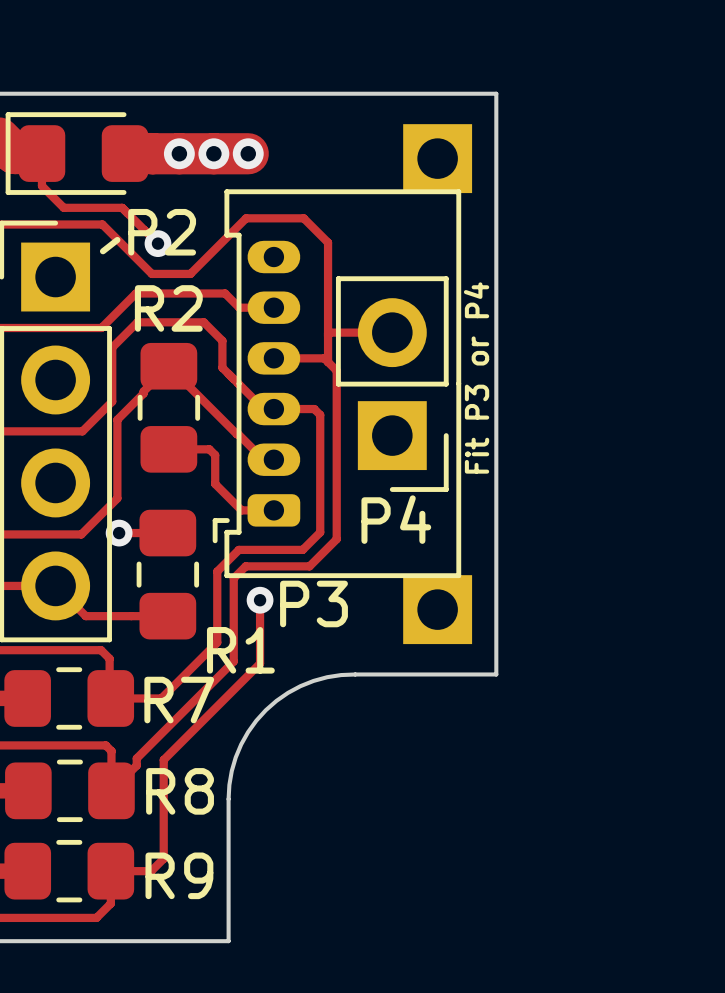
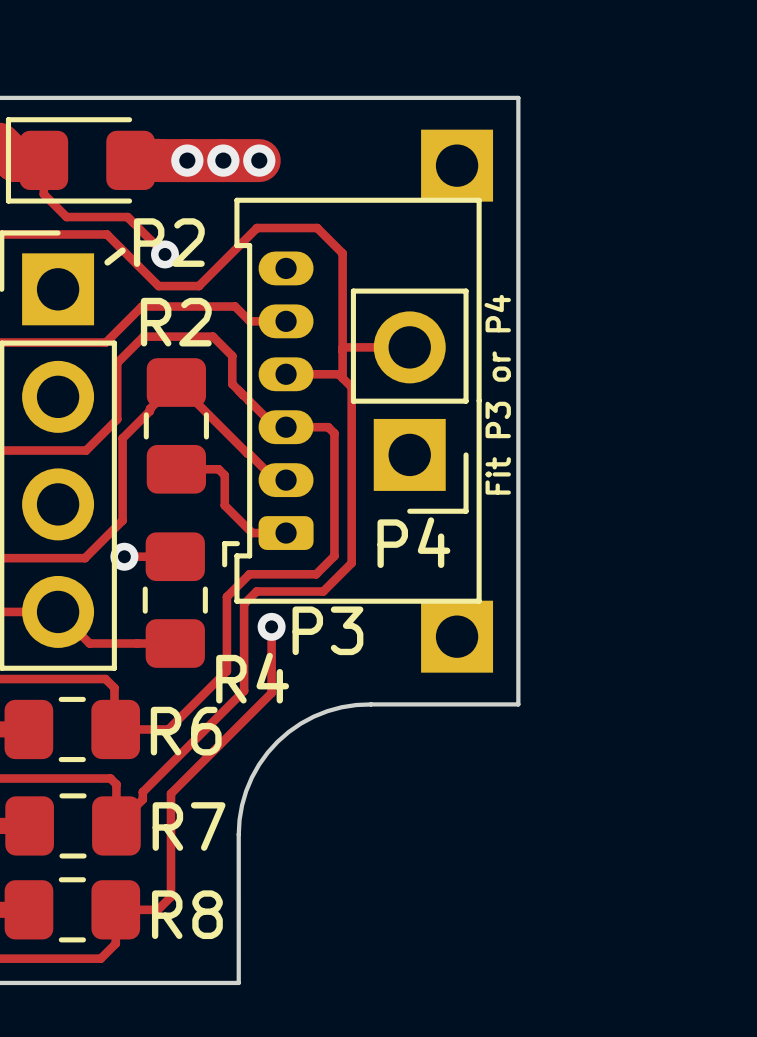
R1 name: R1 (240, 650) -> R4 (252, 678)
R7 name: R7 (179, 700) -> R6 (186, 731)
R8 name: R8 (180, 791) -> R7 (189, 826)
R9 name: R9 (179, 875) -> R8 (187, 914)

